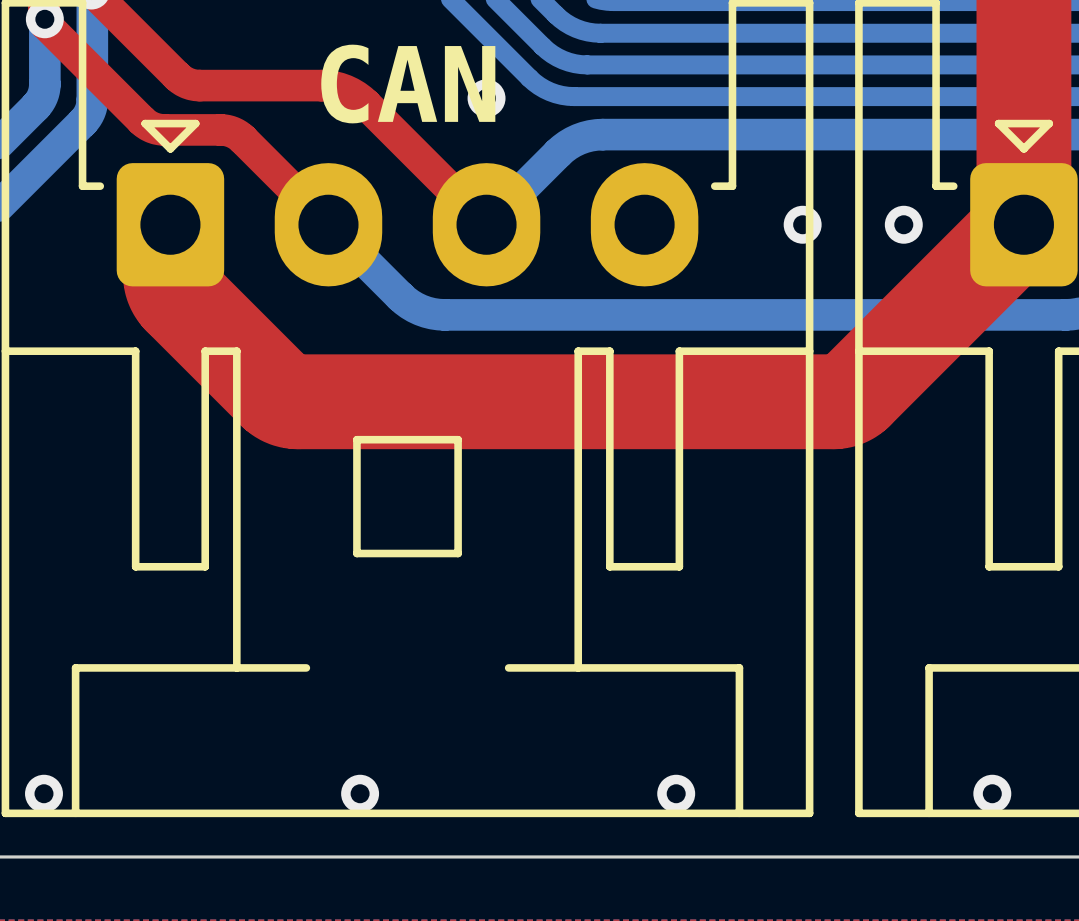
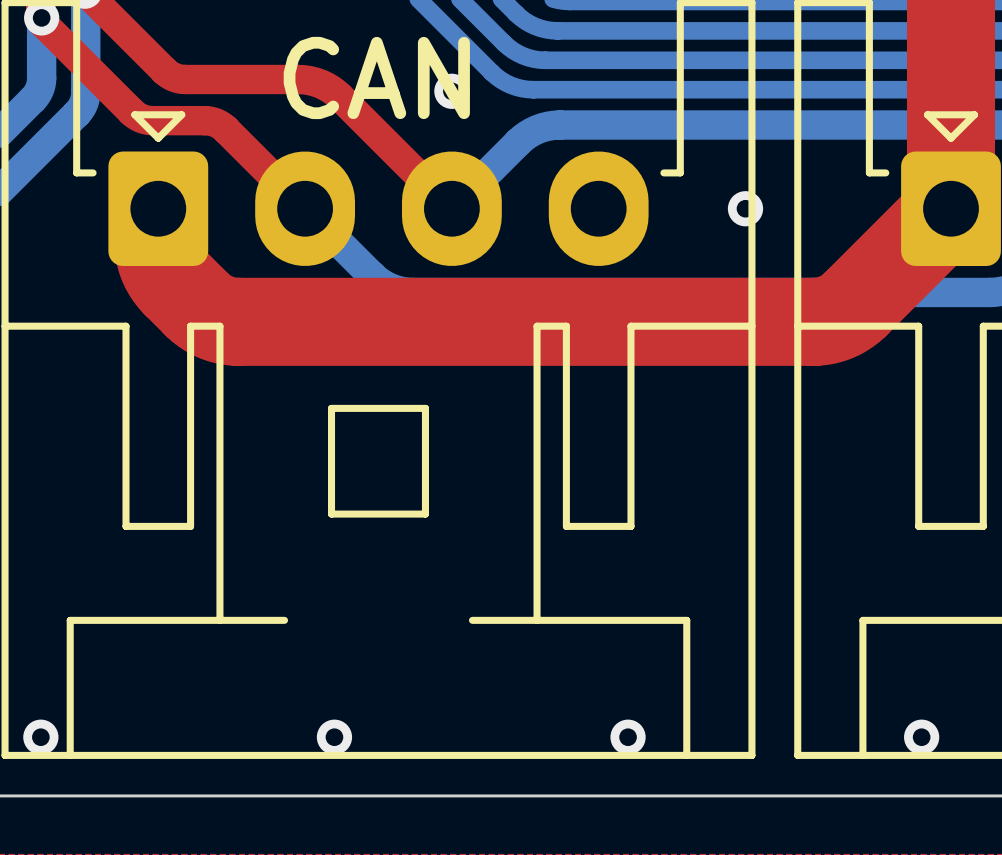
via: (903, 224) -> none
top track: (170, 260) (171, 281) (177, 294) (274, 392) (285, 399) (293, 401) (836, 401) (853, 394) (920, 327) -> (158, 241) (162, 264) (175, 283) (205, 311) (221, 319) (232, 321) (813, 321) (836, 317) (855, 304)

